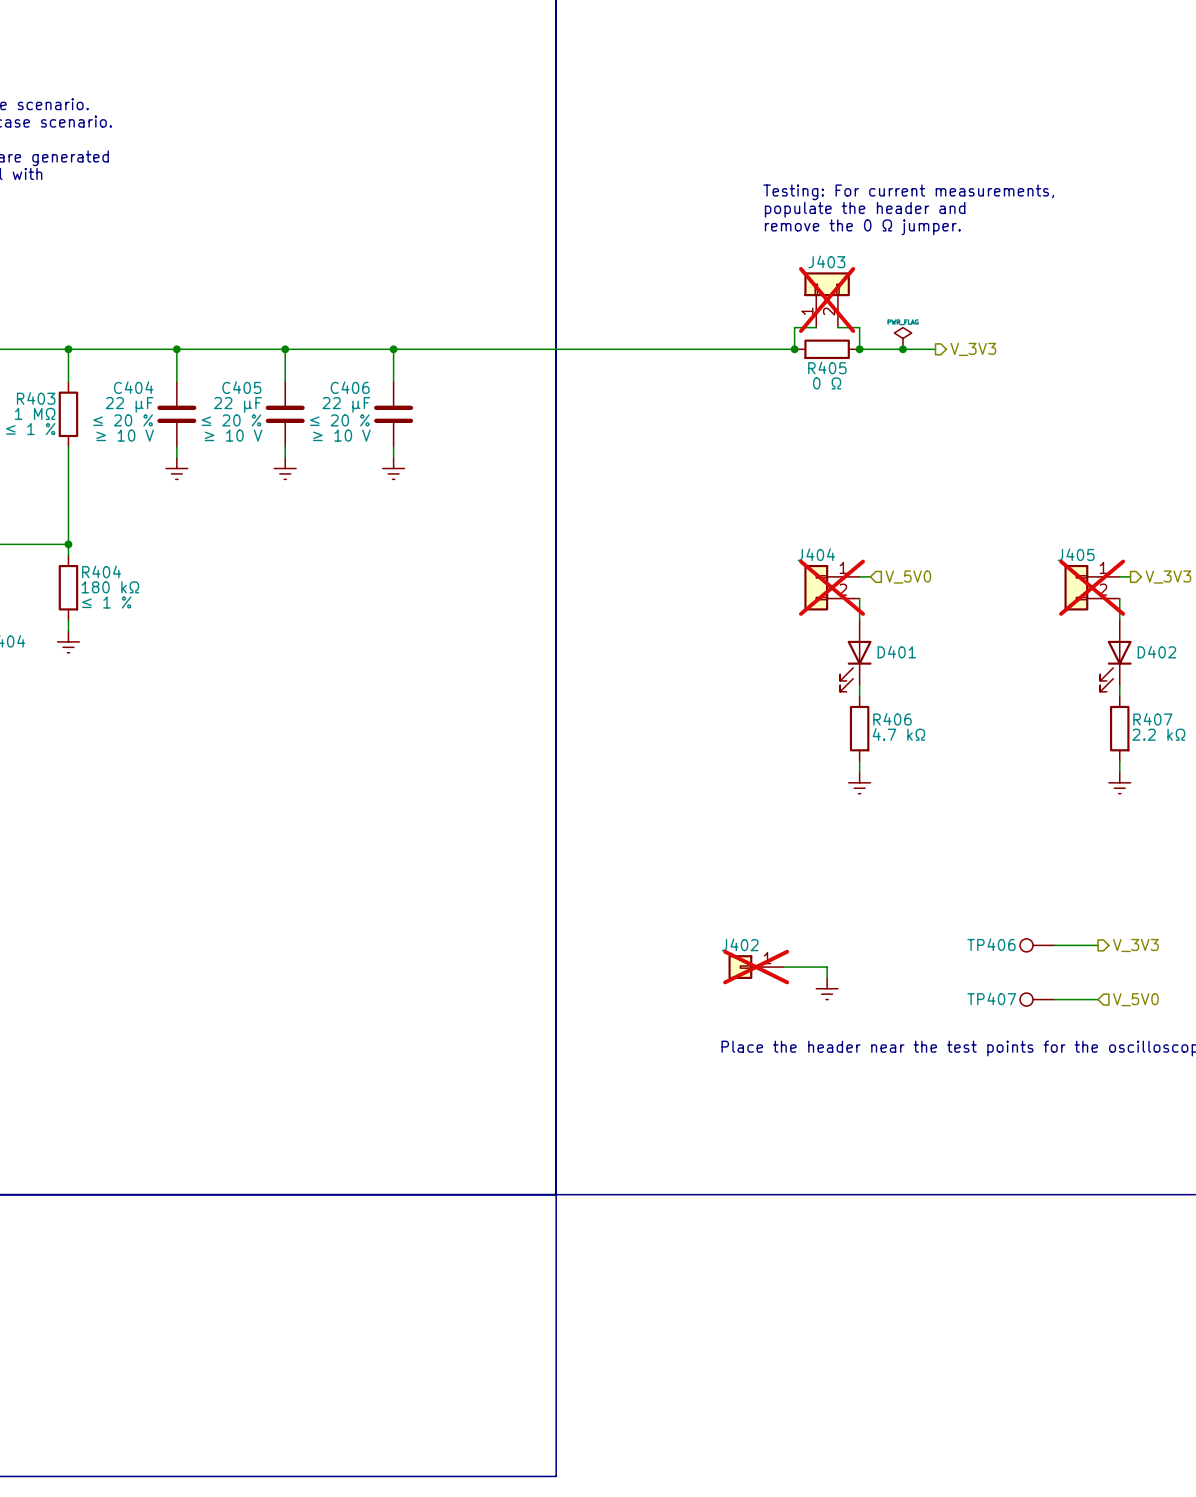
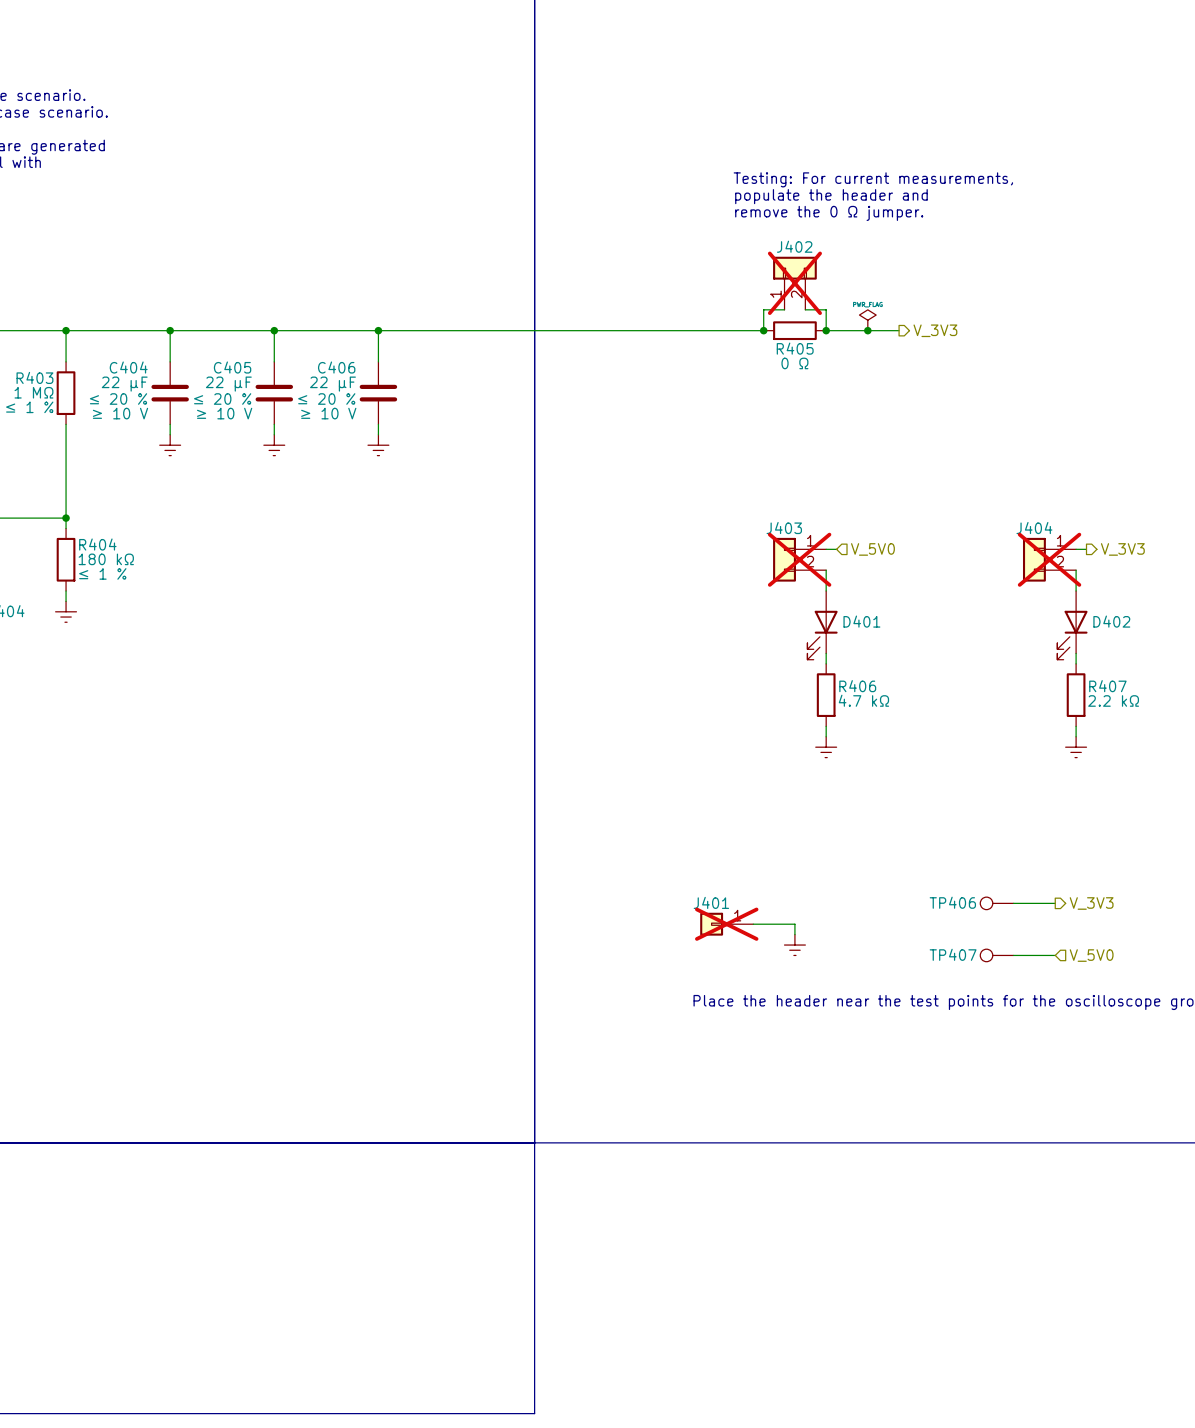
J403 name: J403 (826, 261) -> J402 (794, 246)
J404 name: J404 (816, 554) -> J403 (784, 528)
J405 name: J405 (1076, 554) -> J404 (1034, 528)
J402 name: J402 (740, 944) -> J401 (711, 902)

